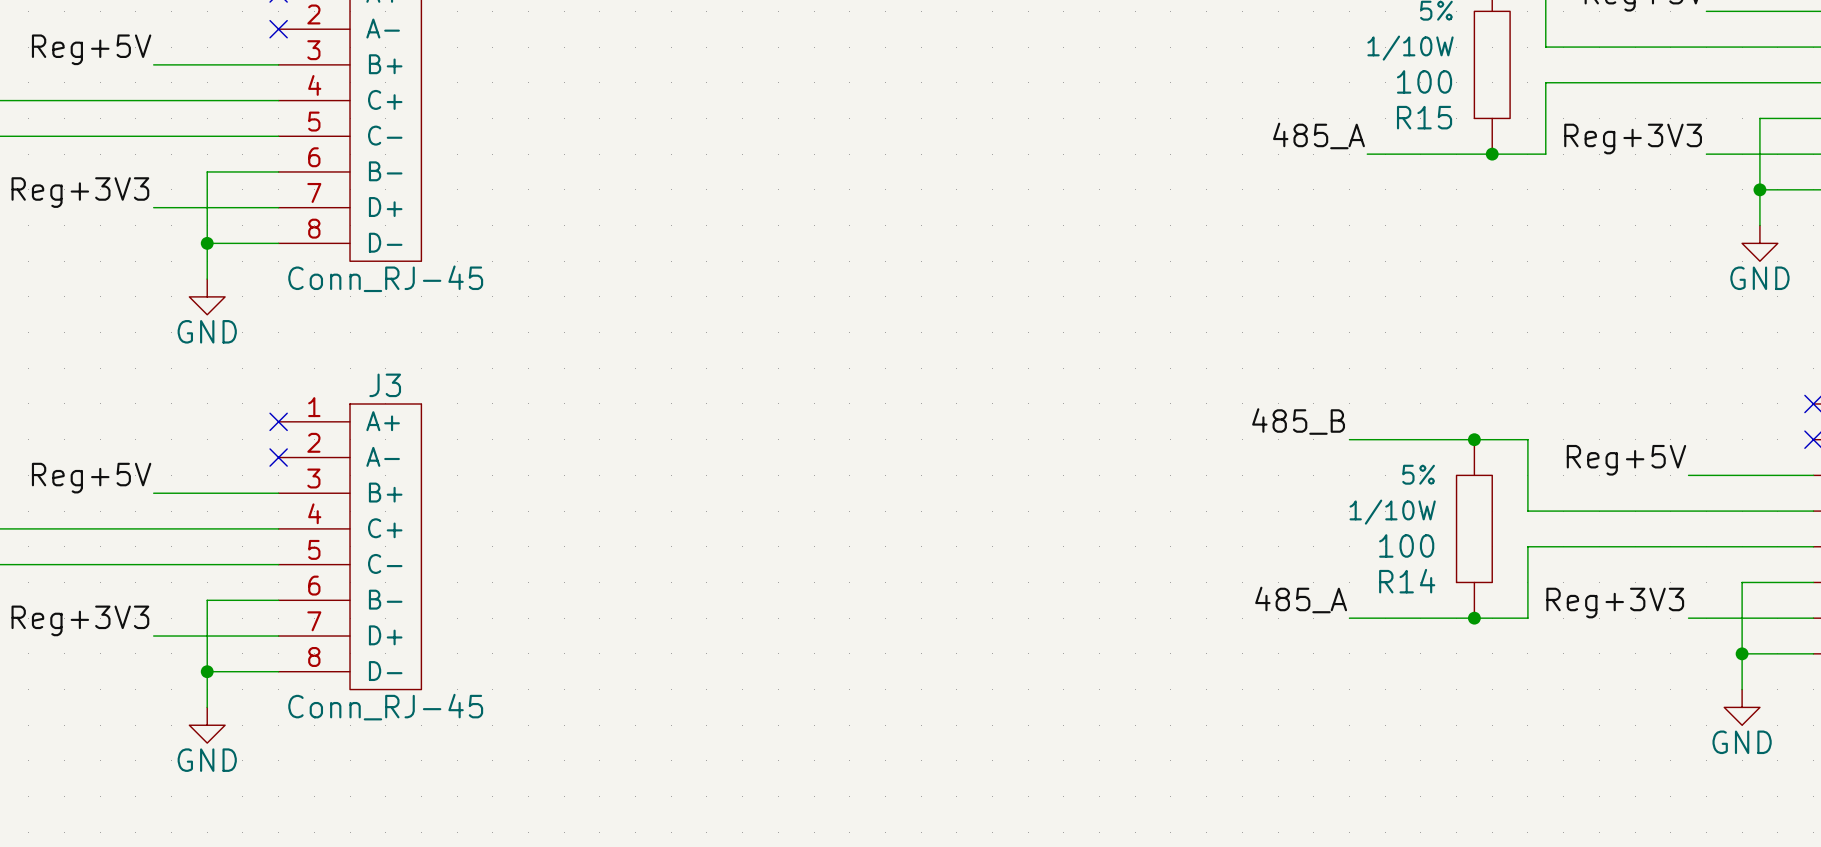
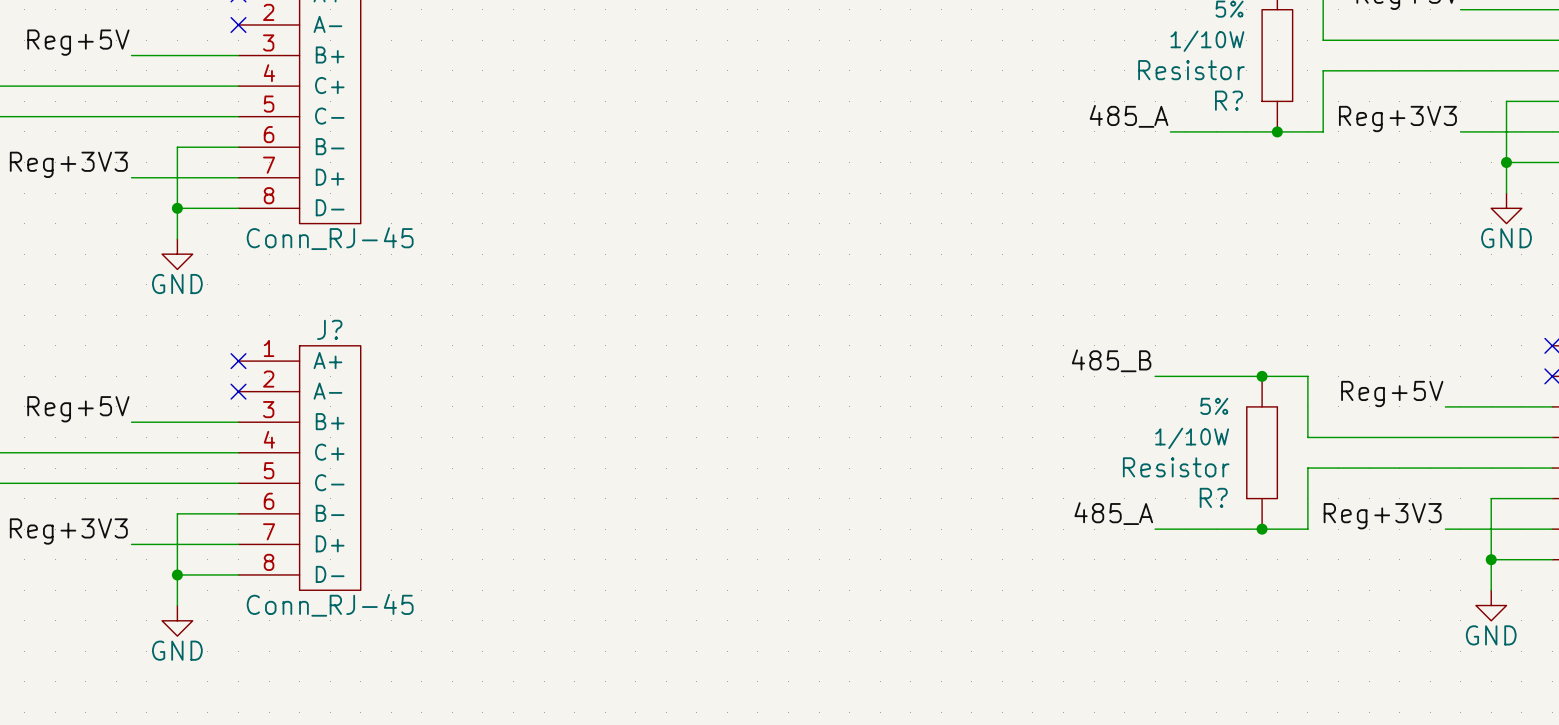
R15 value: 100 (1424, 81) -> Resistor (1191, 70)
R15 name: R15 (1424, 117) -> R? (1229, 100)
J3 name: J3 (385, 385) -> J? (329, 329)
R14 value: 100 (1406, 545) -> Resistor (1176, 467)
R14 name: R14 (1407, 581) -> R? (1213, 497)

